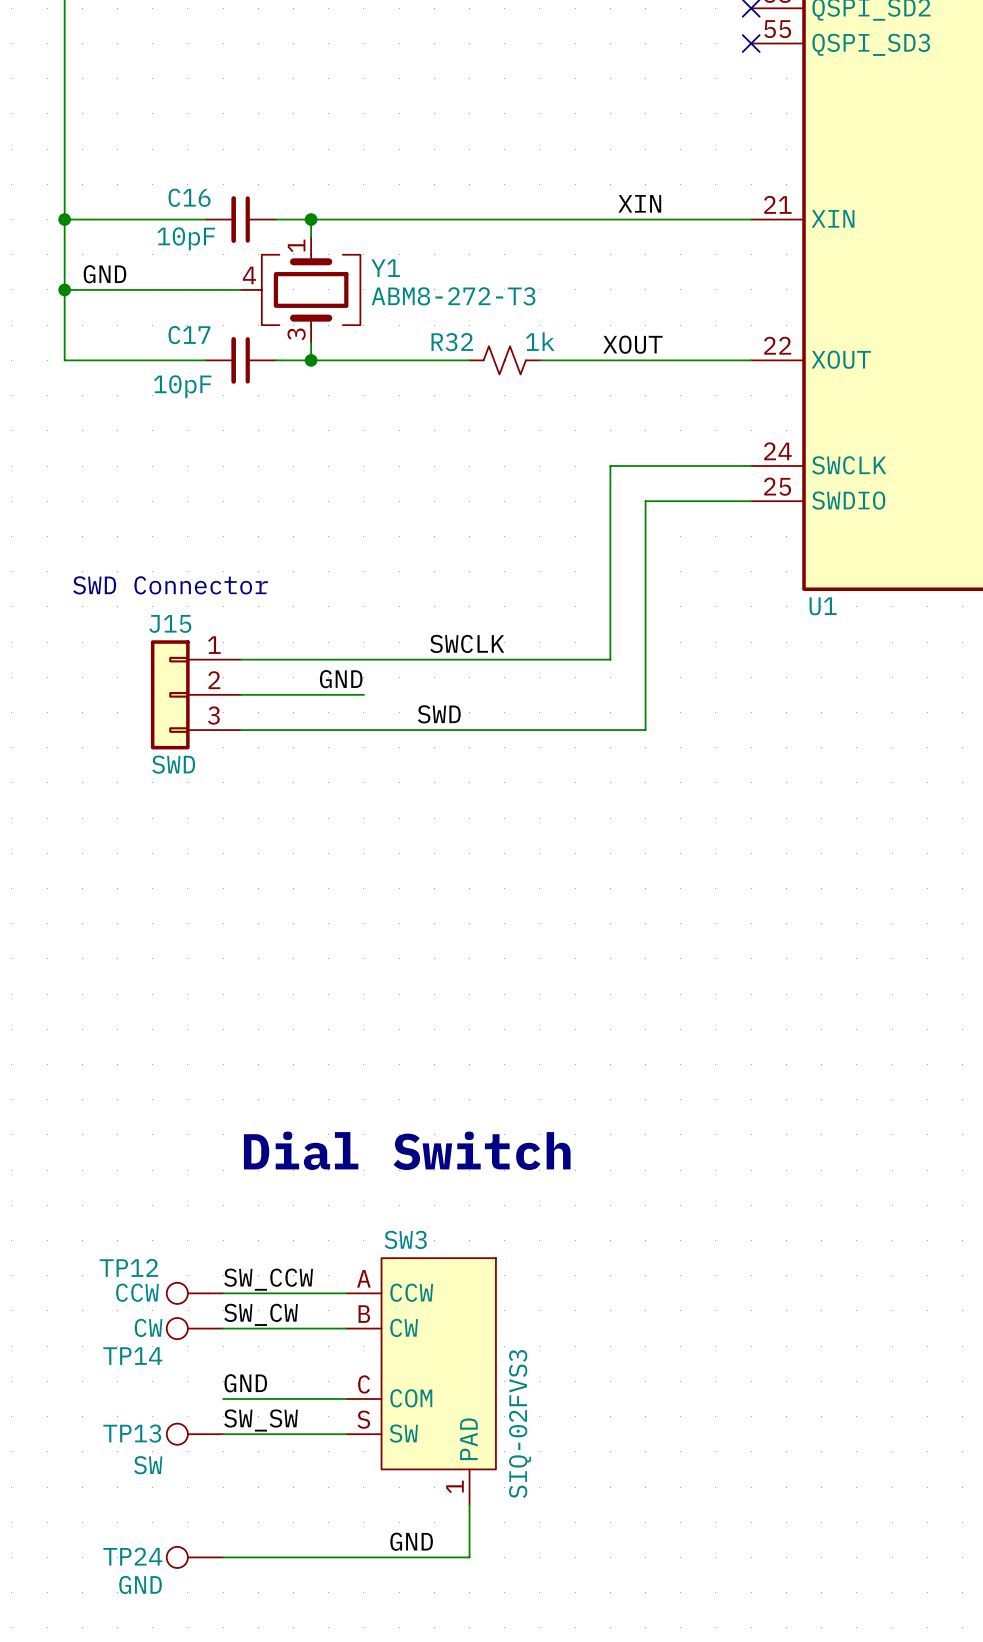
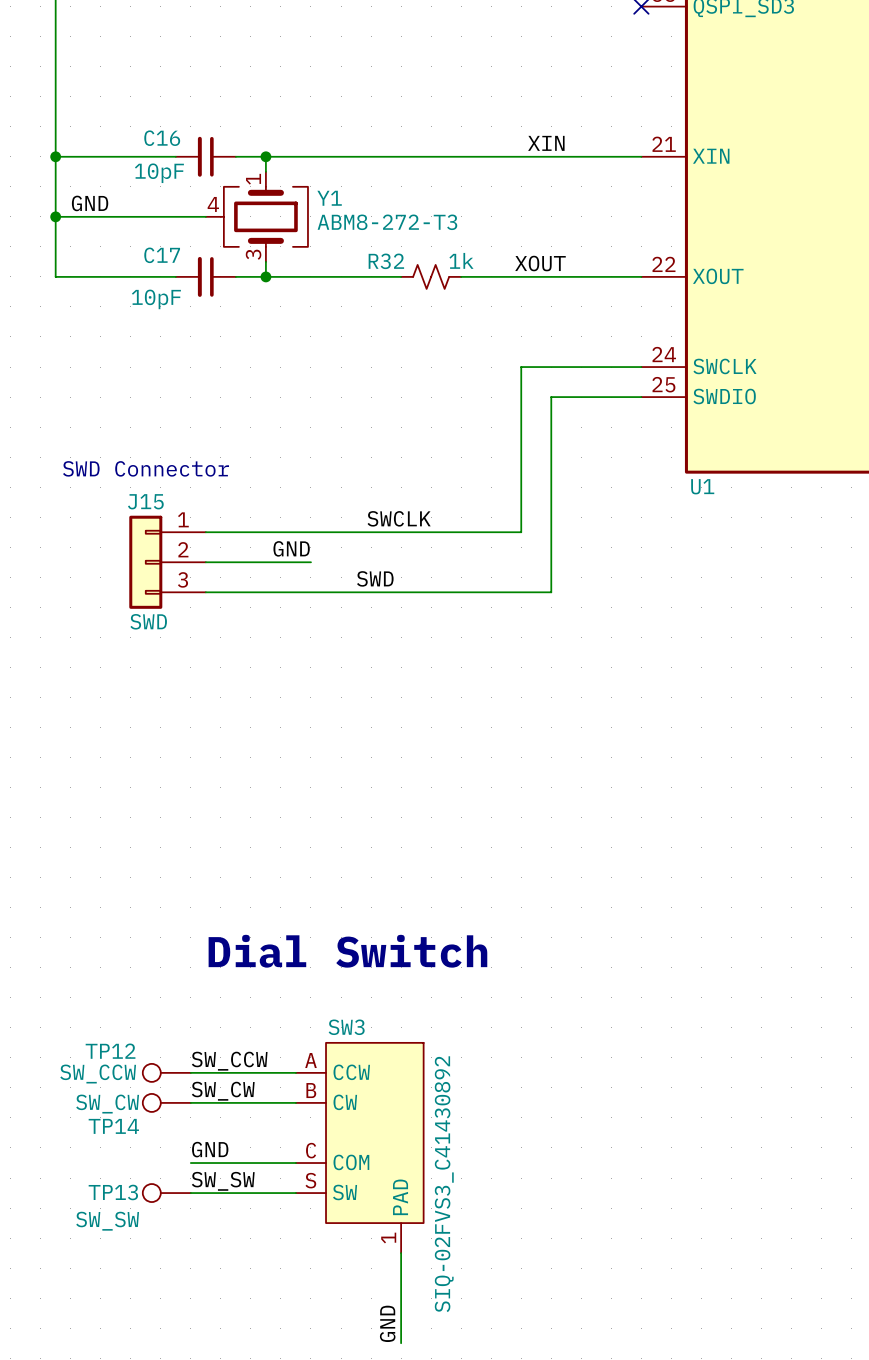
TP12 value: CCW (137, 1292) -> SW_CCW (98, 1074)
TP14 value: CW (148, 1327) -> SW_CW (107, 1104)
SW3 value: SIQ-02FVS3 (520, 1424) -> SIQ-02FVS3_C41430892 (444, 1184)
TP13 value: SW (148, 1465) -> SW_SW (107, 1221)
label rotation: 0° (411, 1541) -> 90° counterclockwise (387, 1323)
TP24: GND (194, 1557) -> none
wire: (223, 1557) (469, 1557) -> (401, 1343) (401, 1298)

